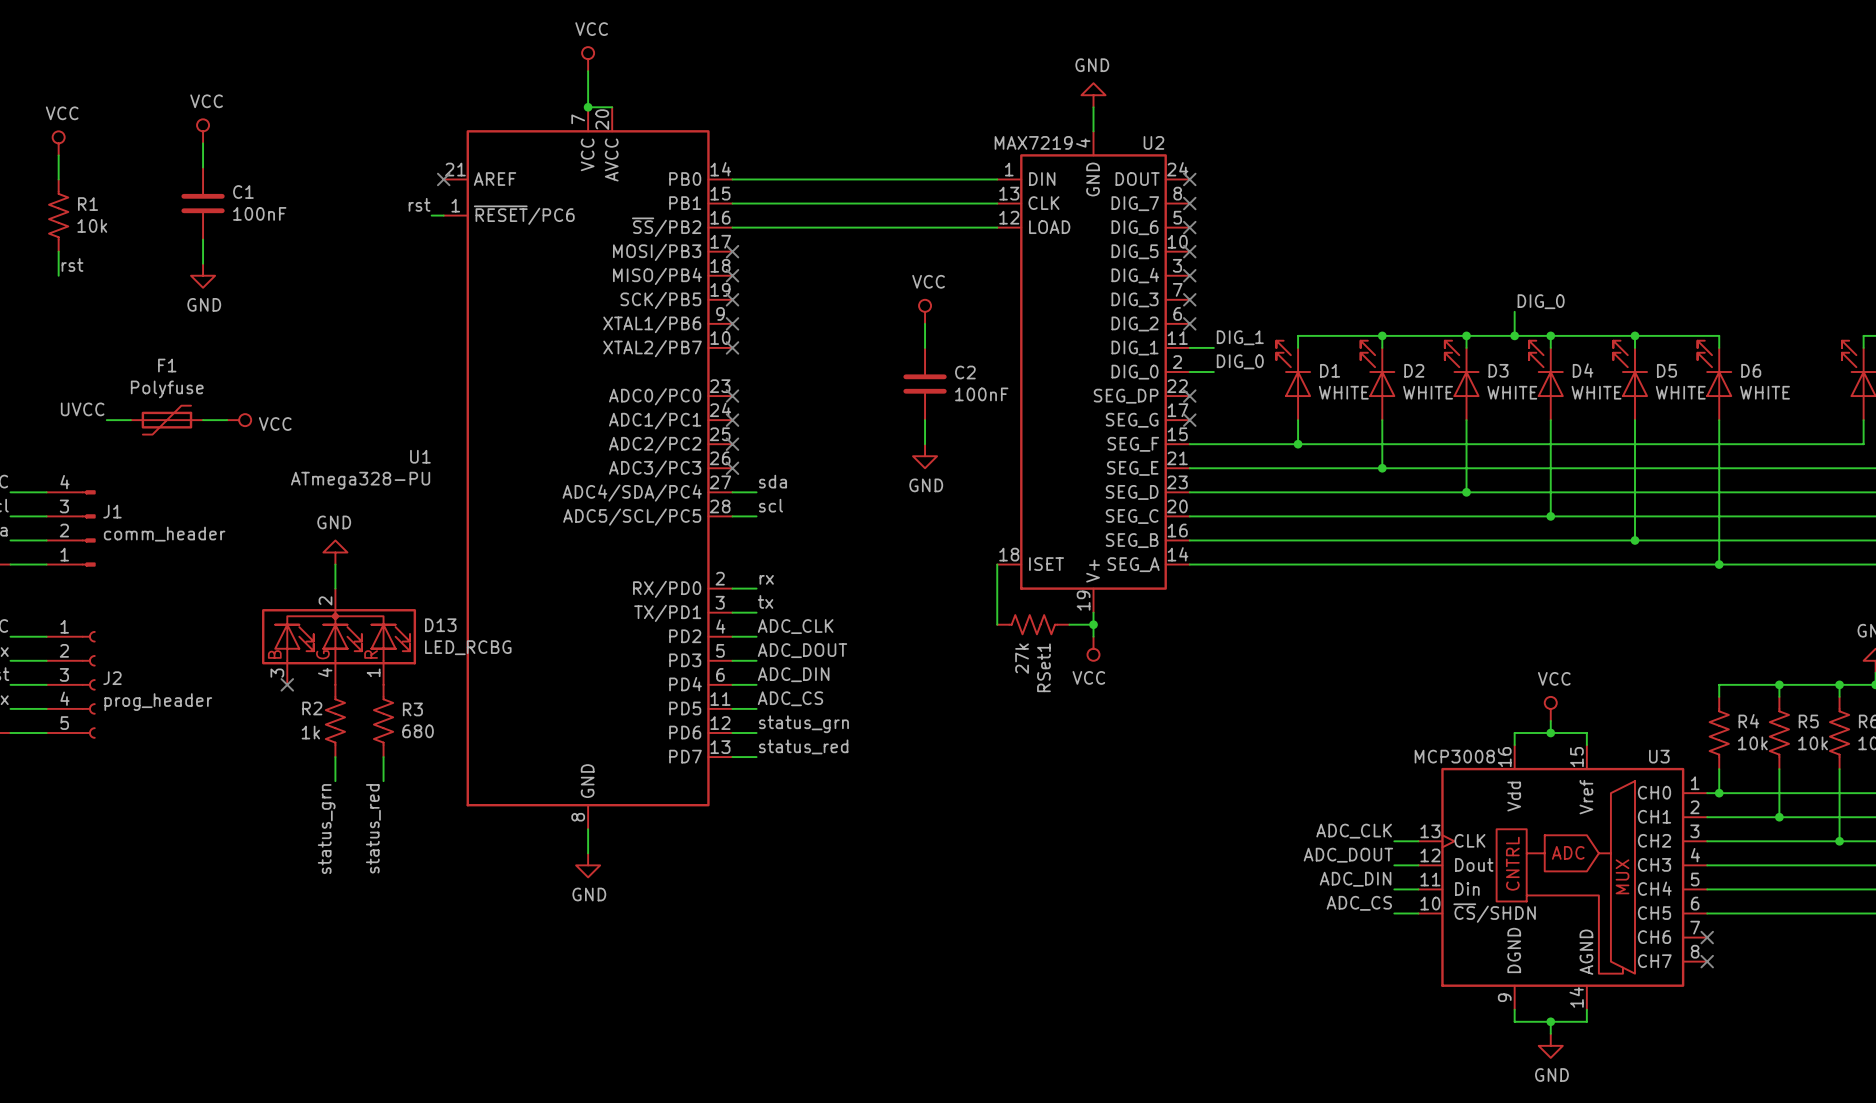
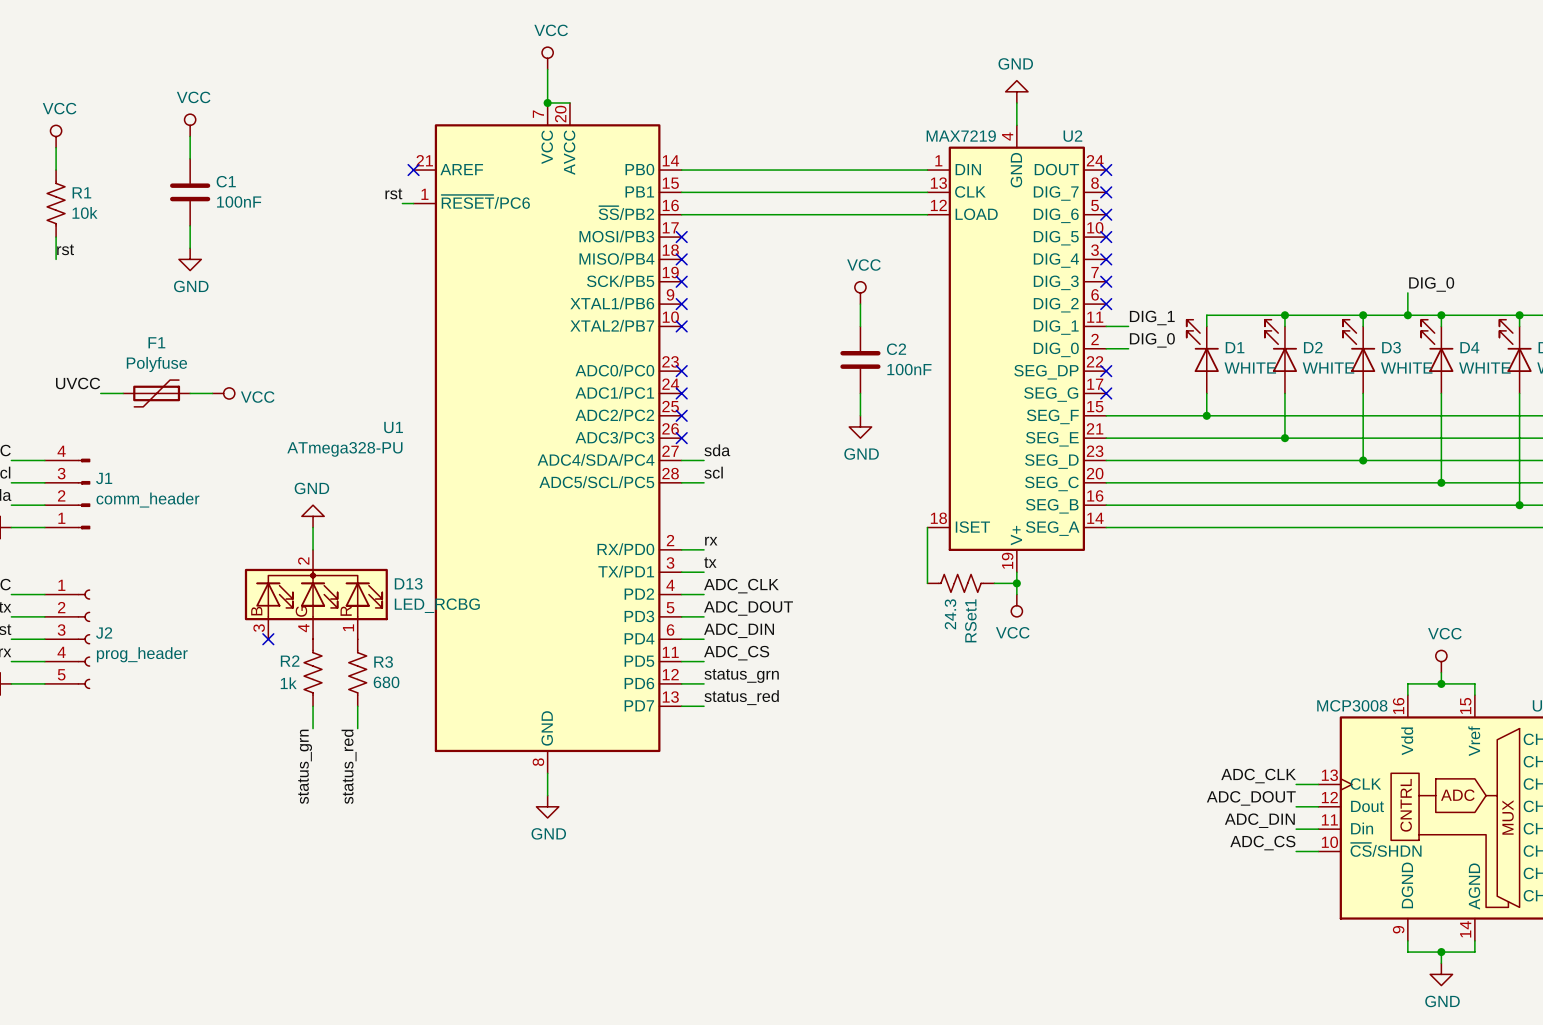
RSet1 value: 27k (1022, 658) -> 24.3 (950, 614)

